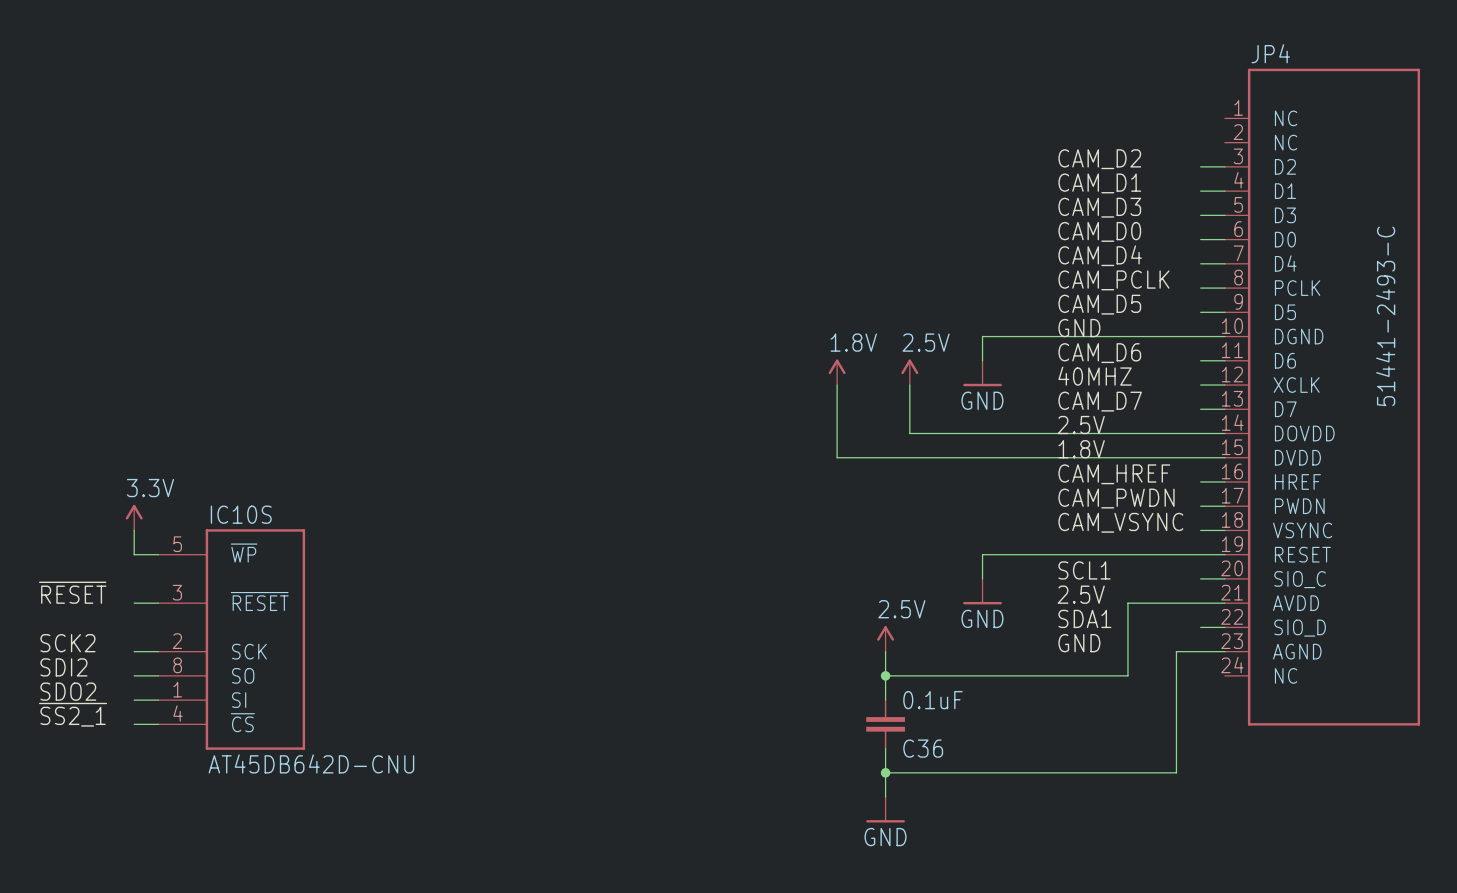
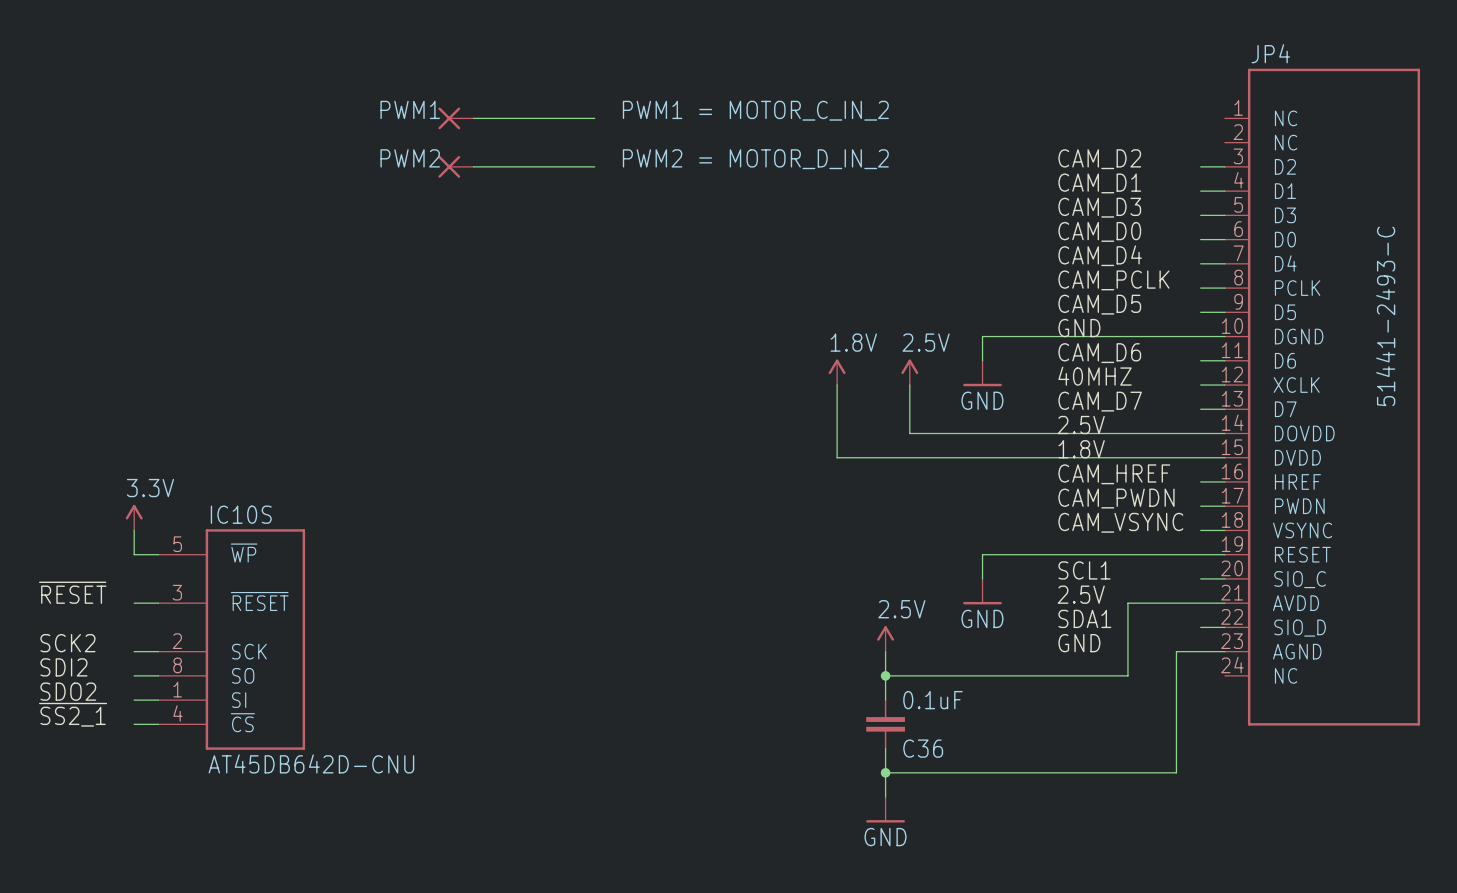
PWM1: none -> (455, 118)
wire: none -> (473, 118) (594, 118)
PWM2: none -> (455, 166)
wire: none -> (473, 166) (594, 166)

